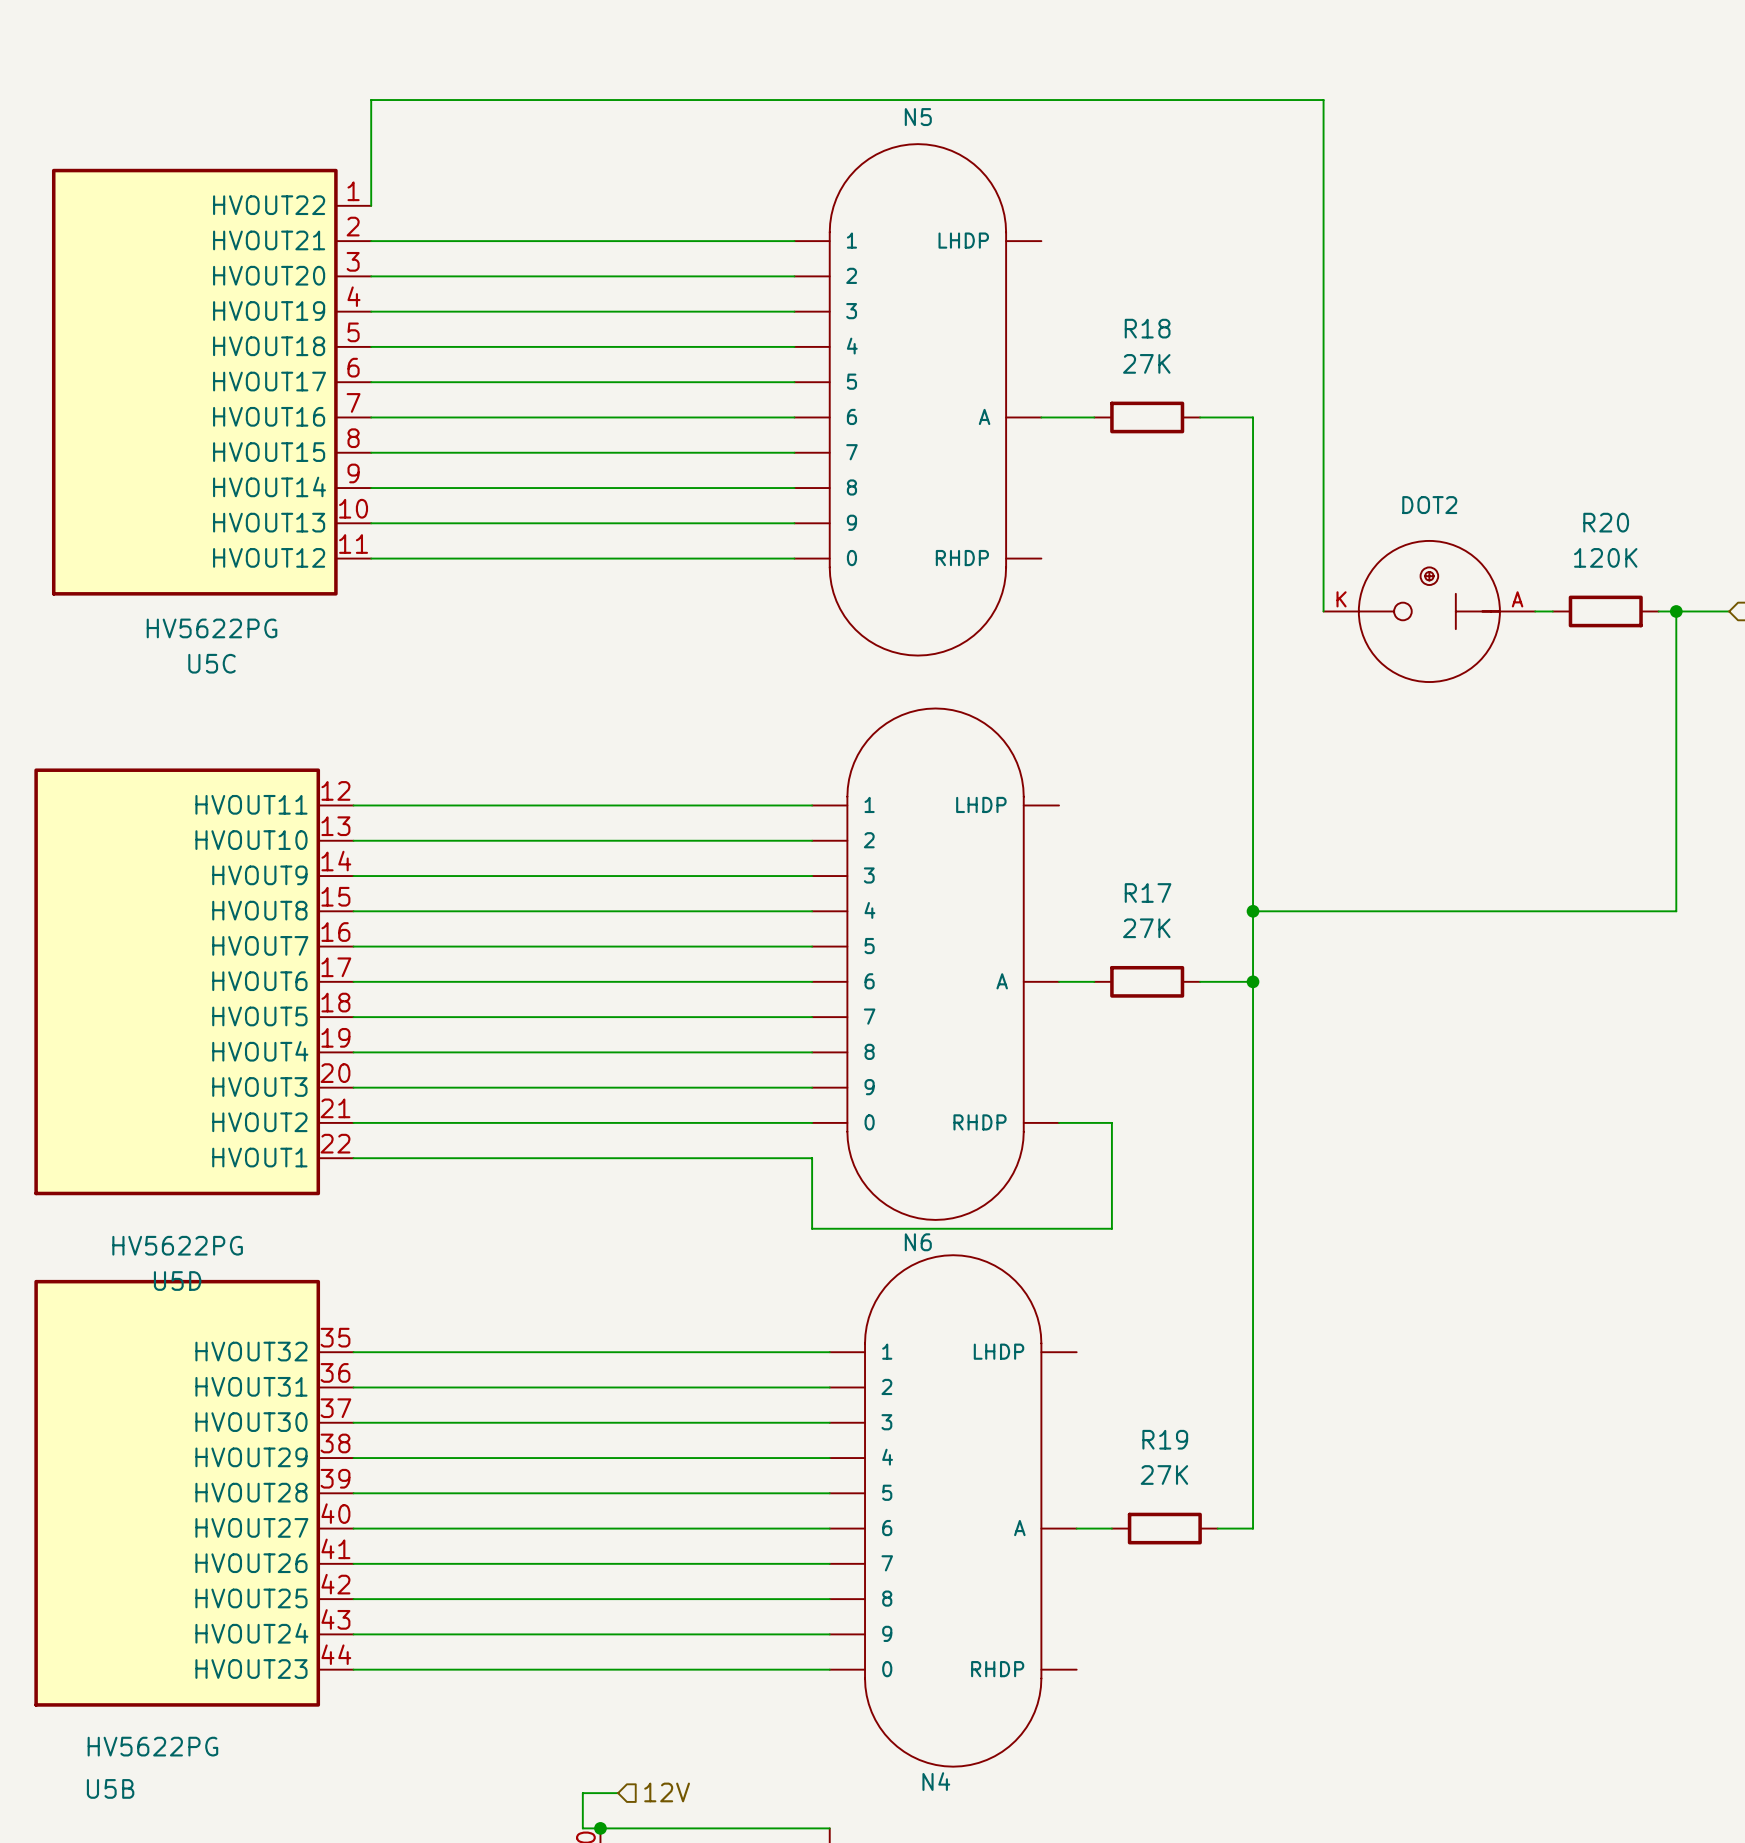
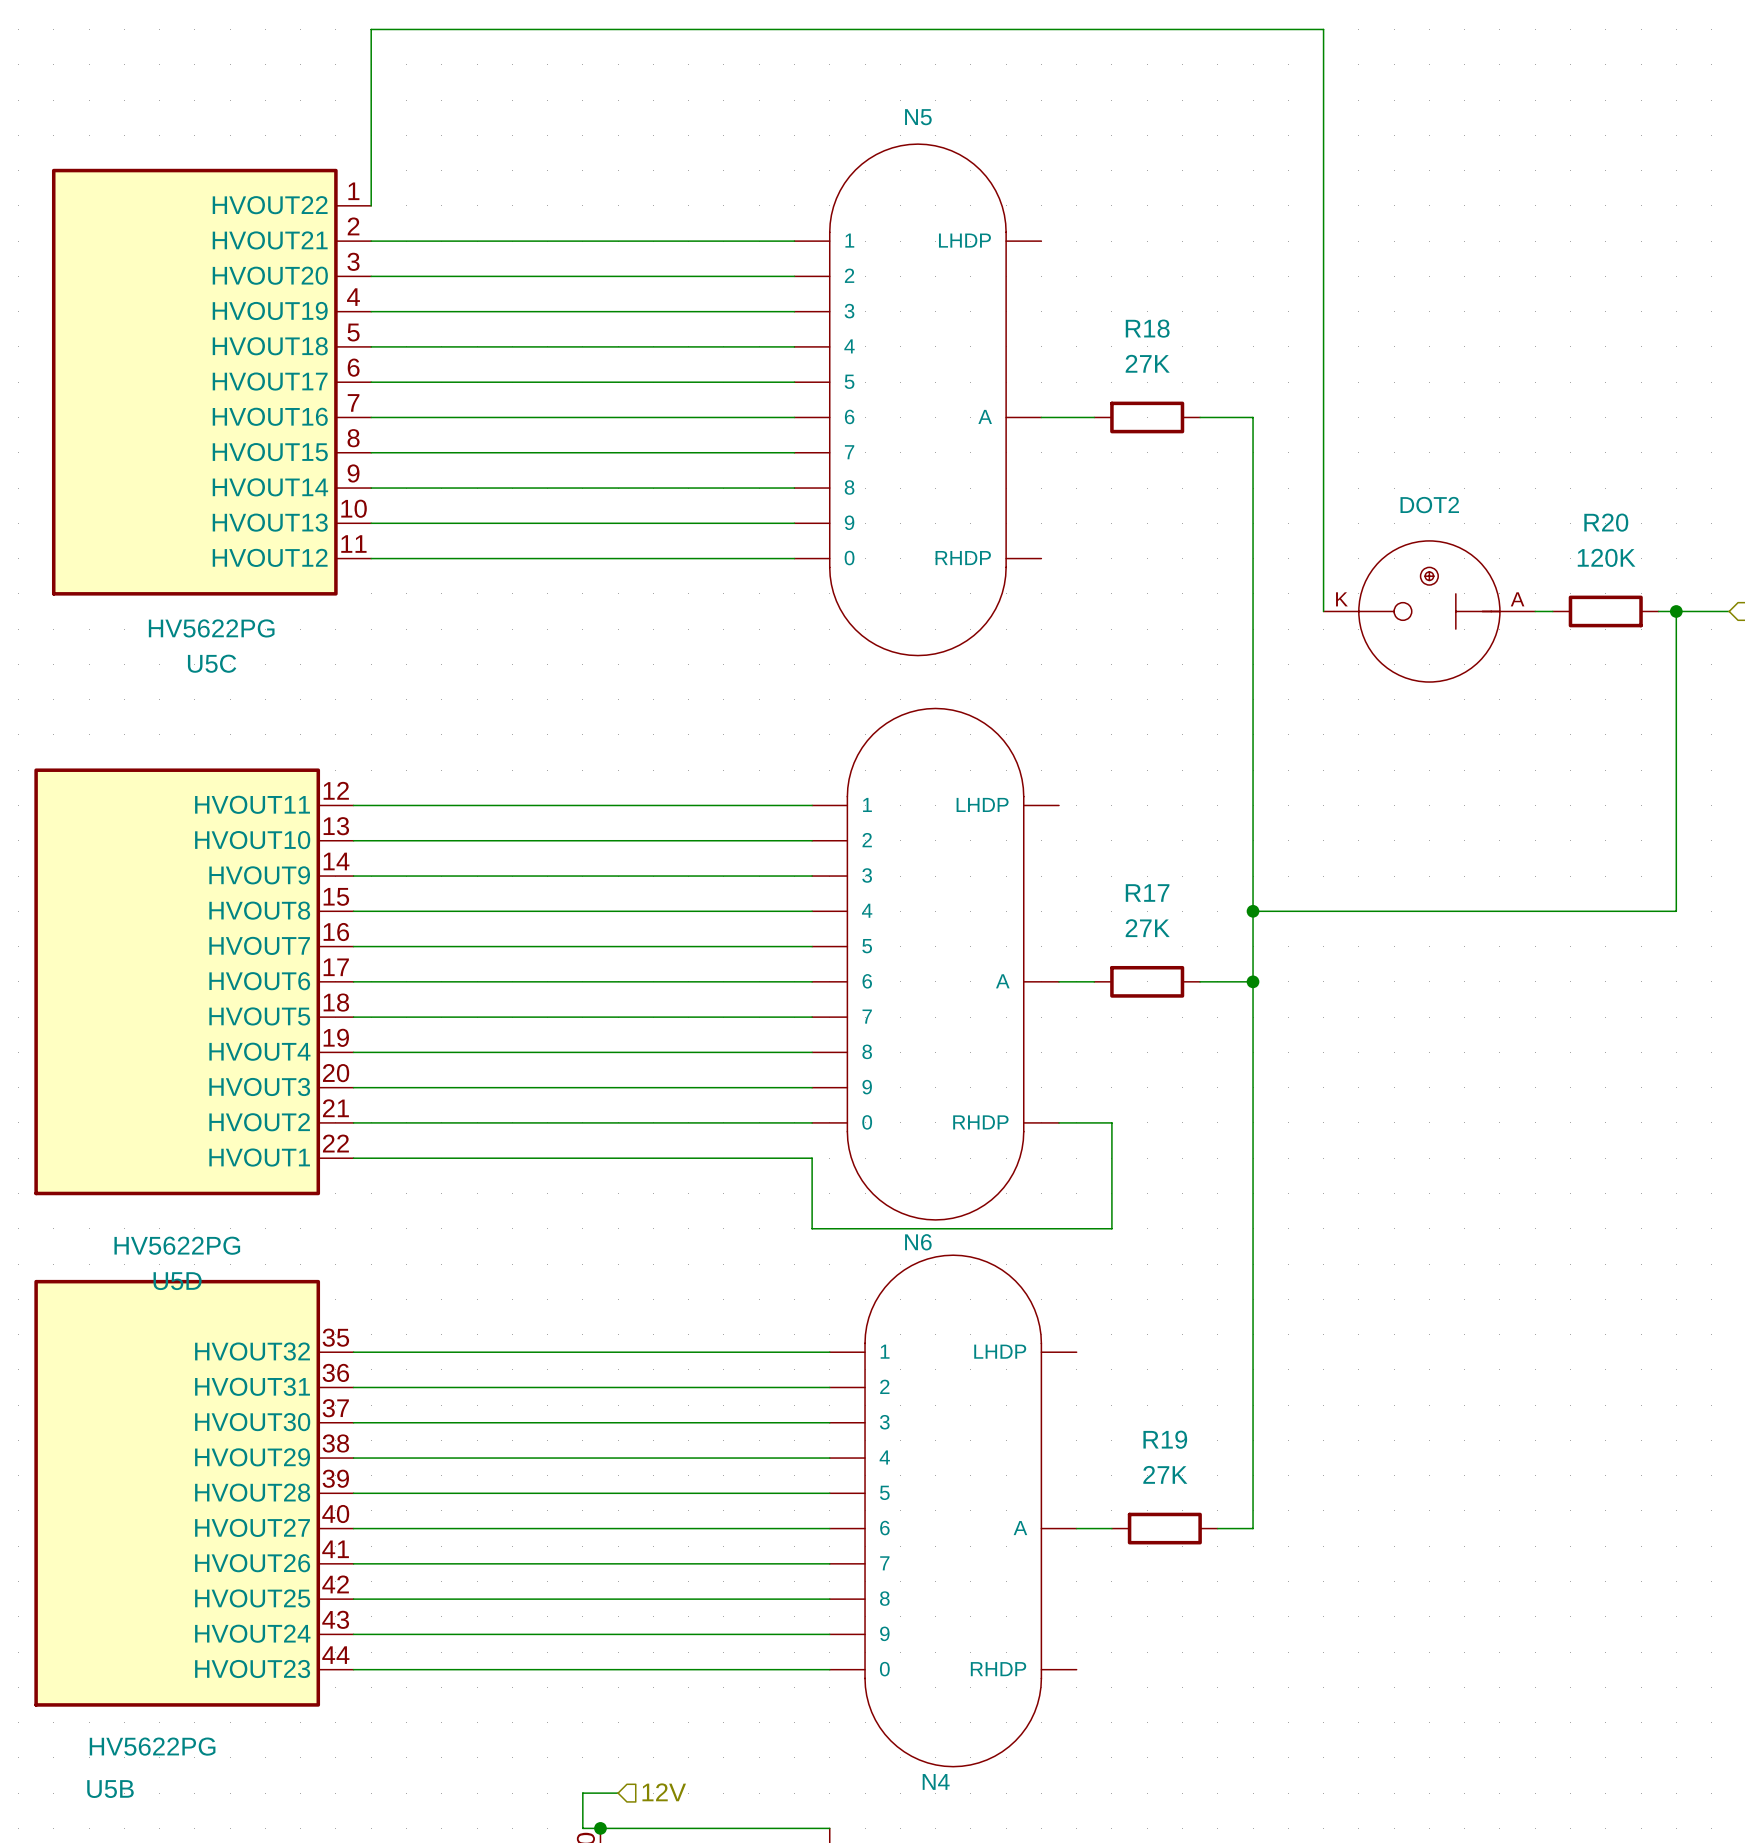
wire: (371, 100) (1323, 100) -> (371, 100) (371, 29) (1323, 29) (1323, 100)

